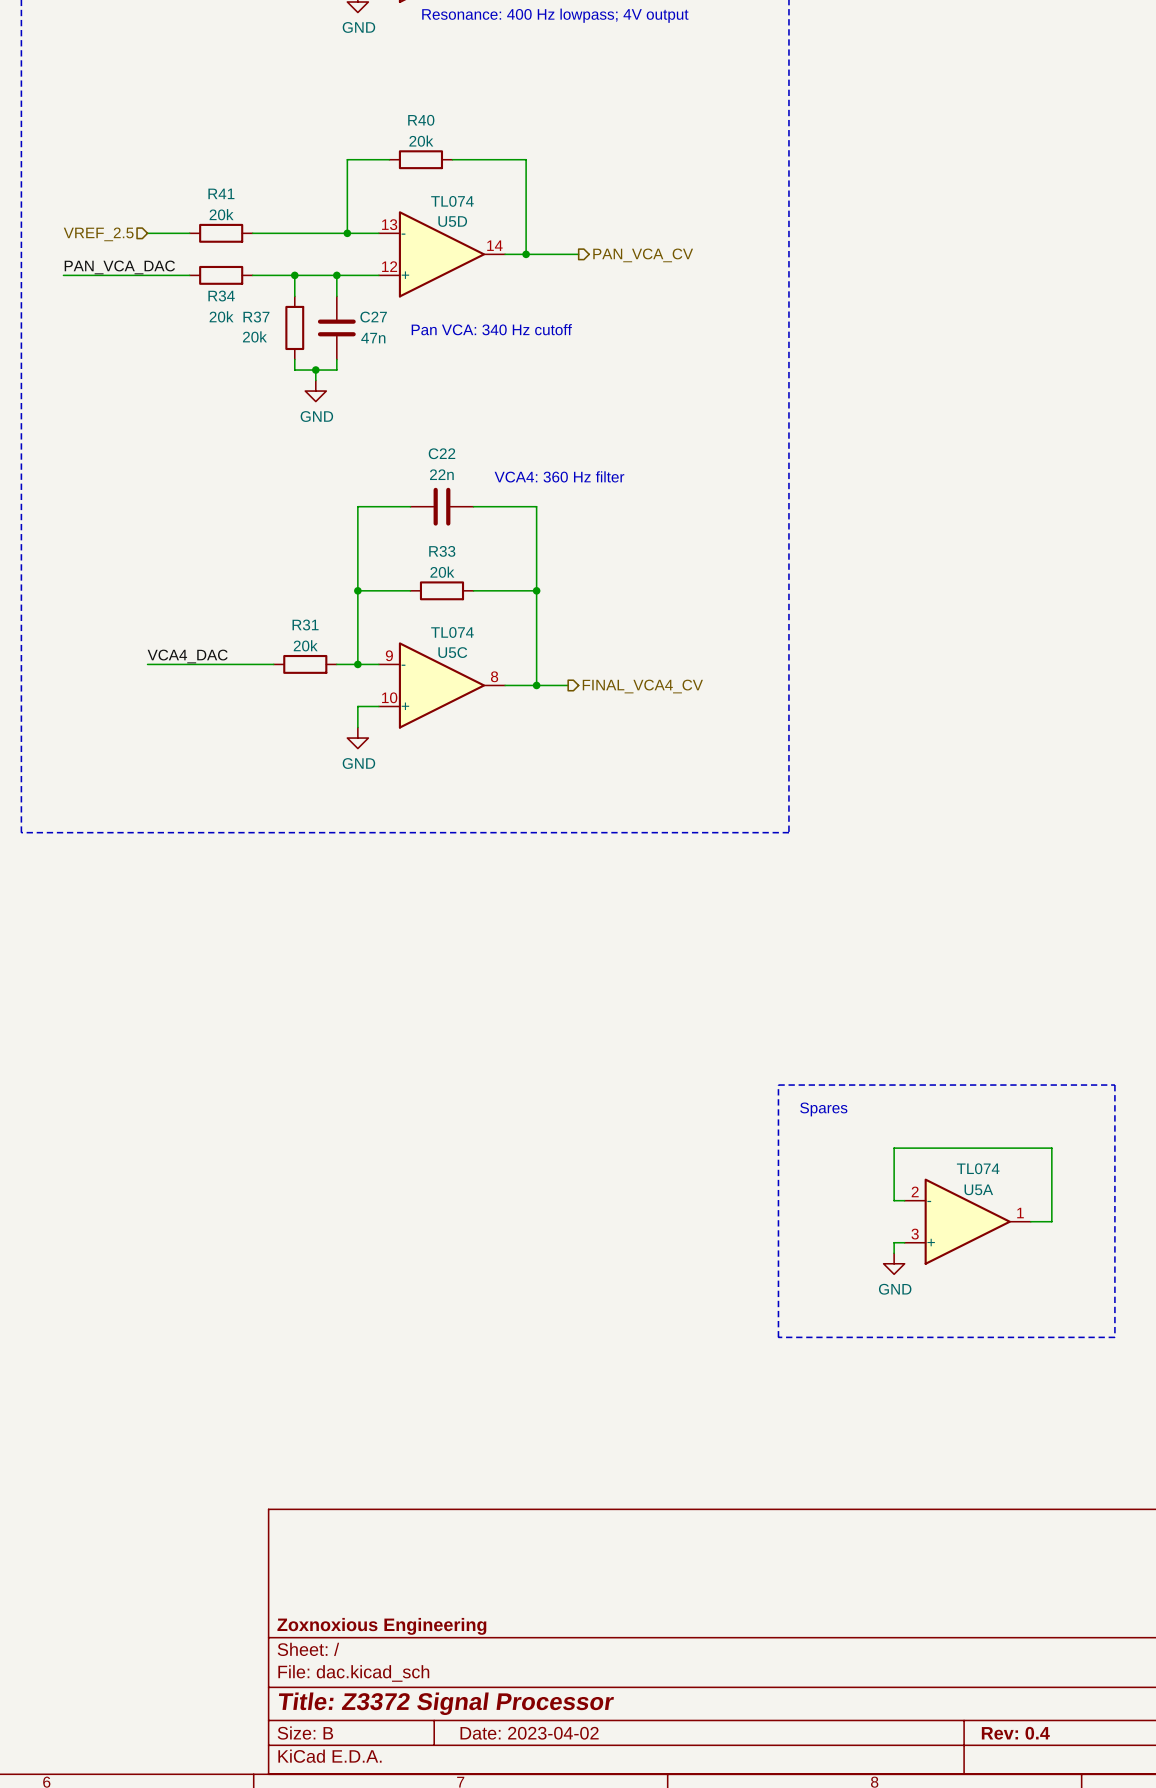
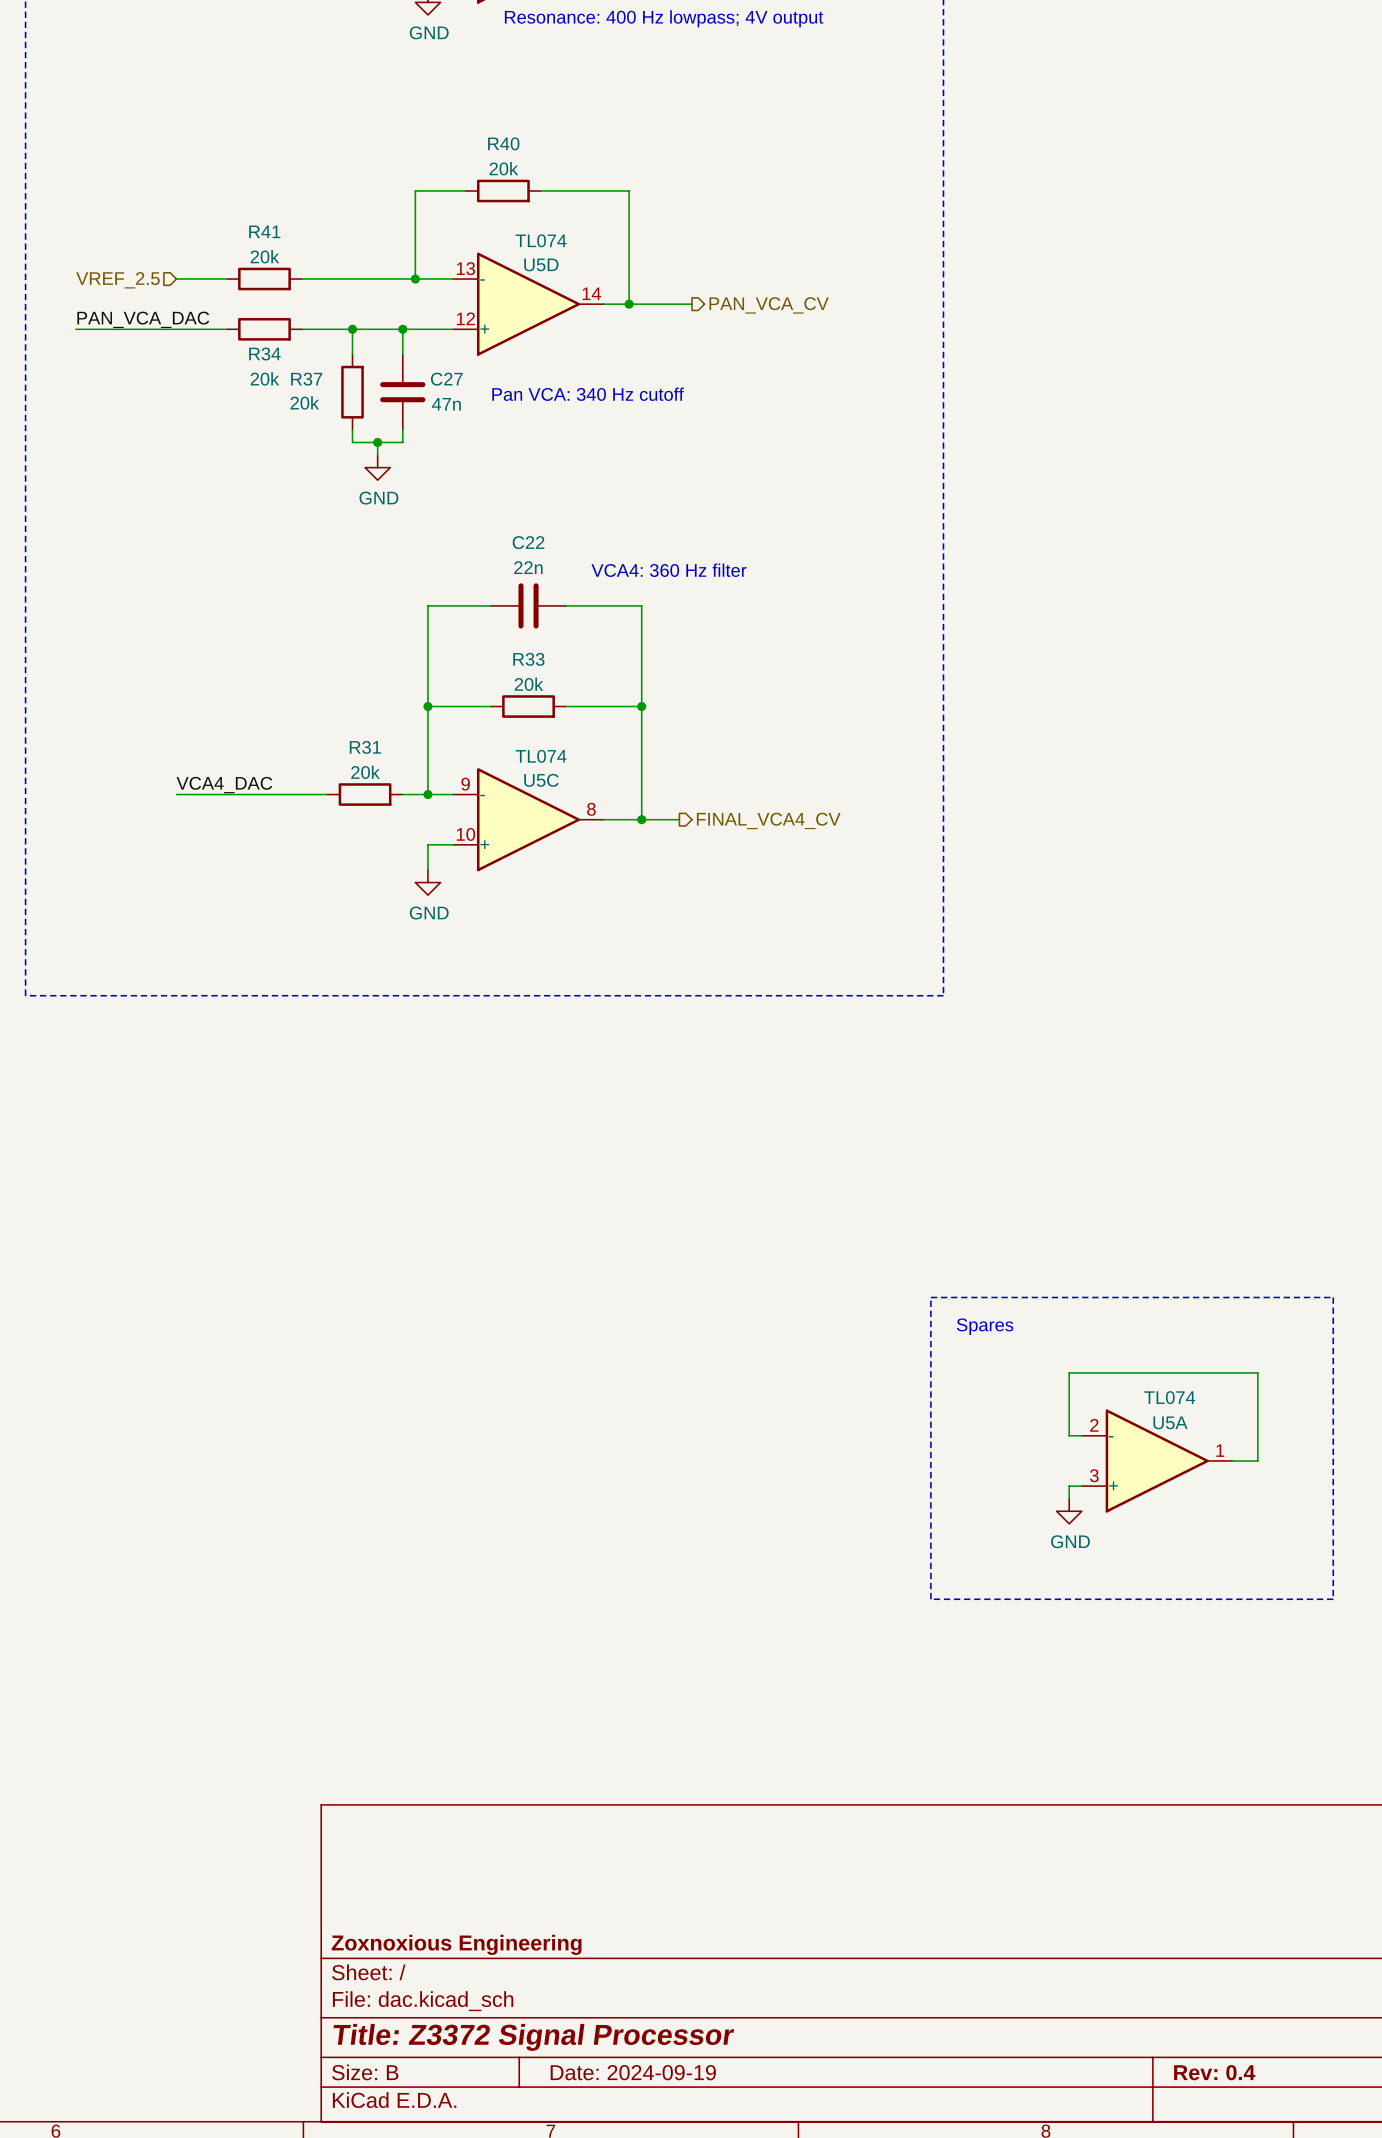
title block: Date: 2023-04-02 (529, 1733) -> Date: 2024-09-19 (633, 2072)

